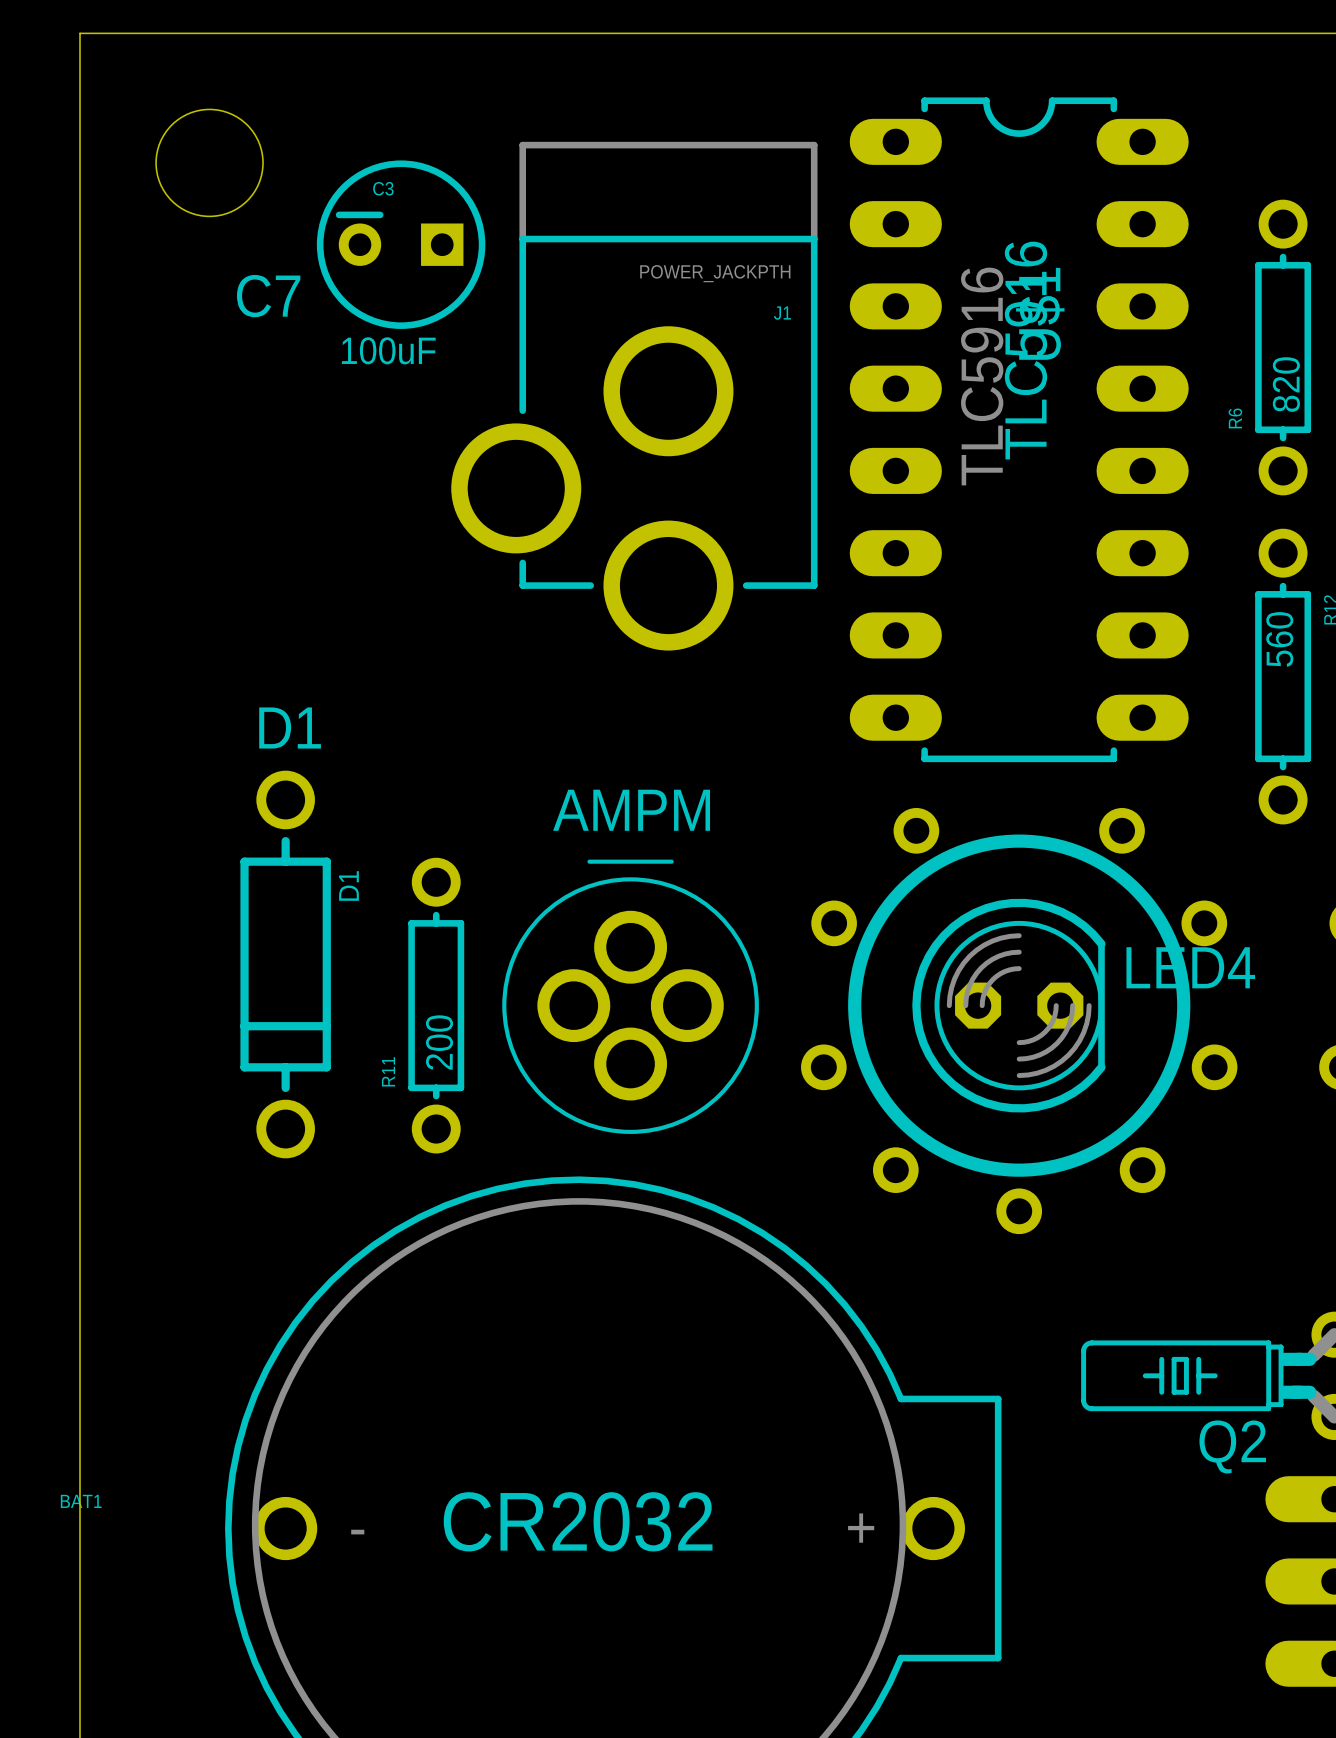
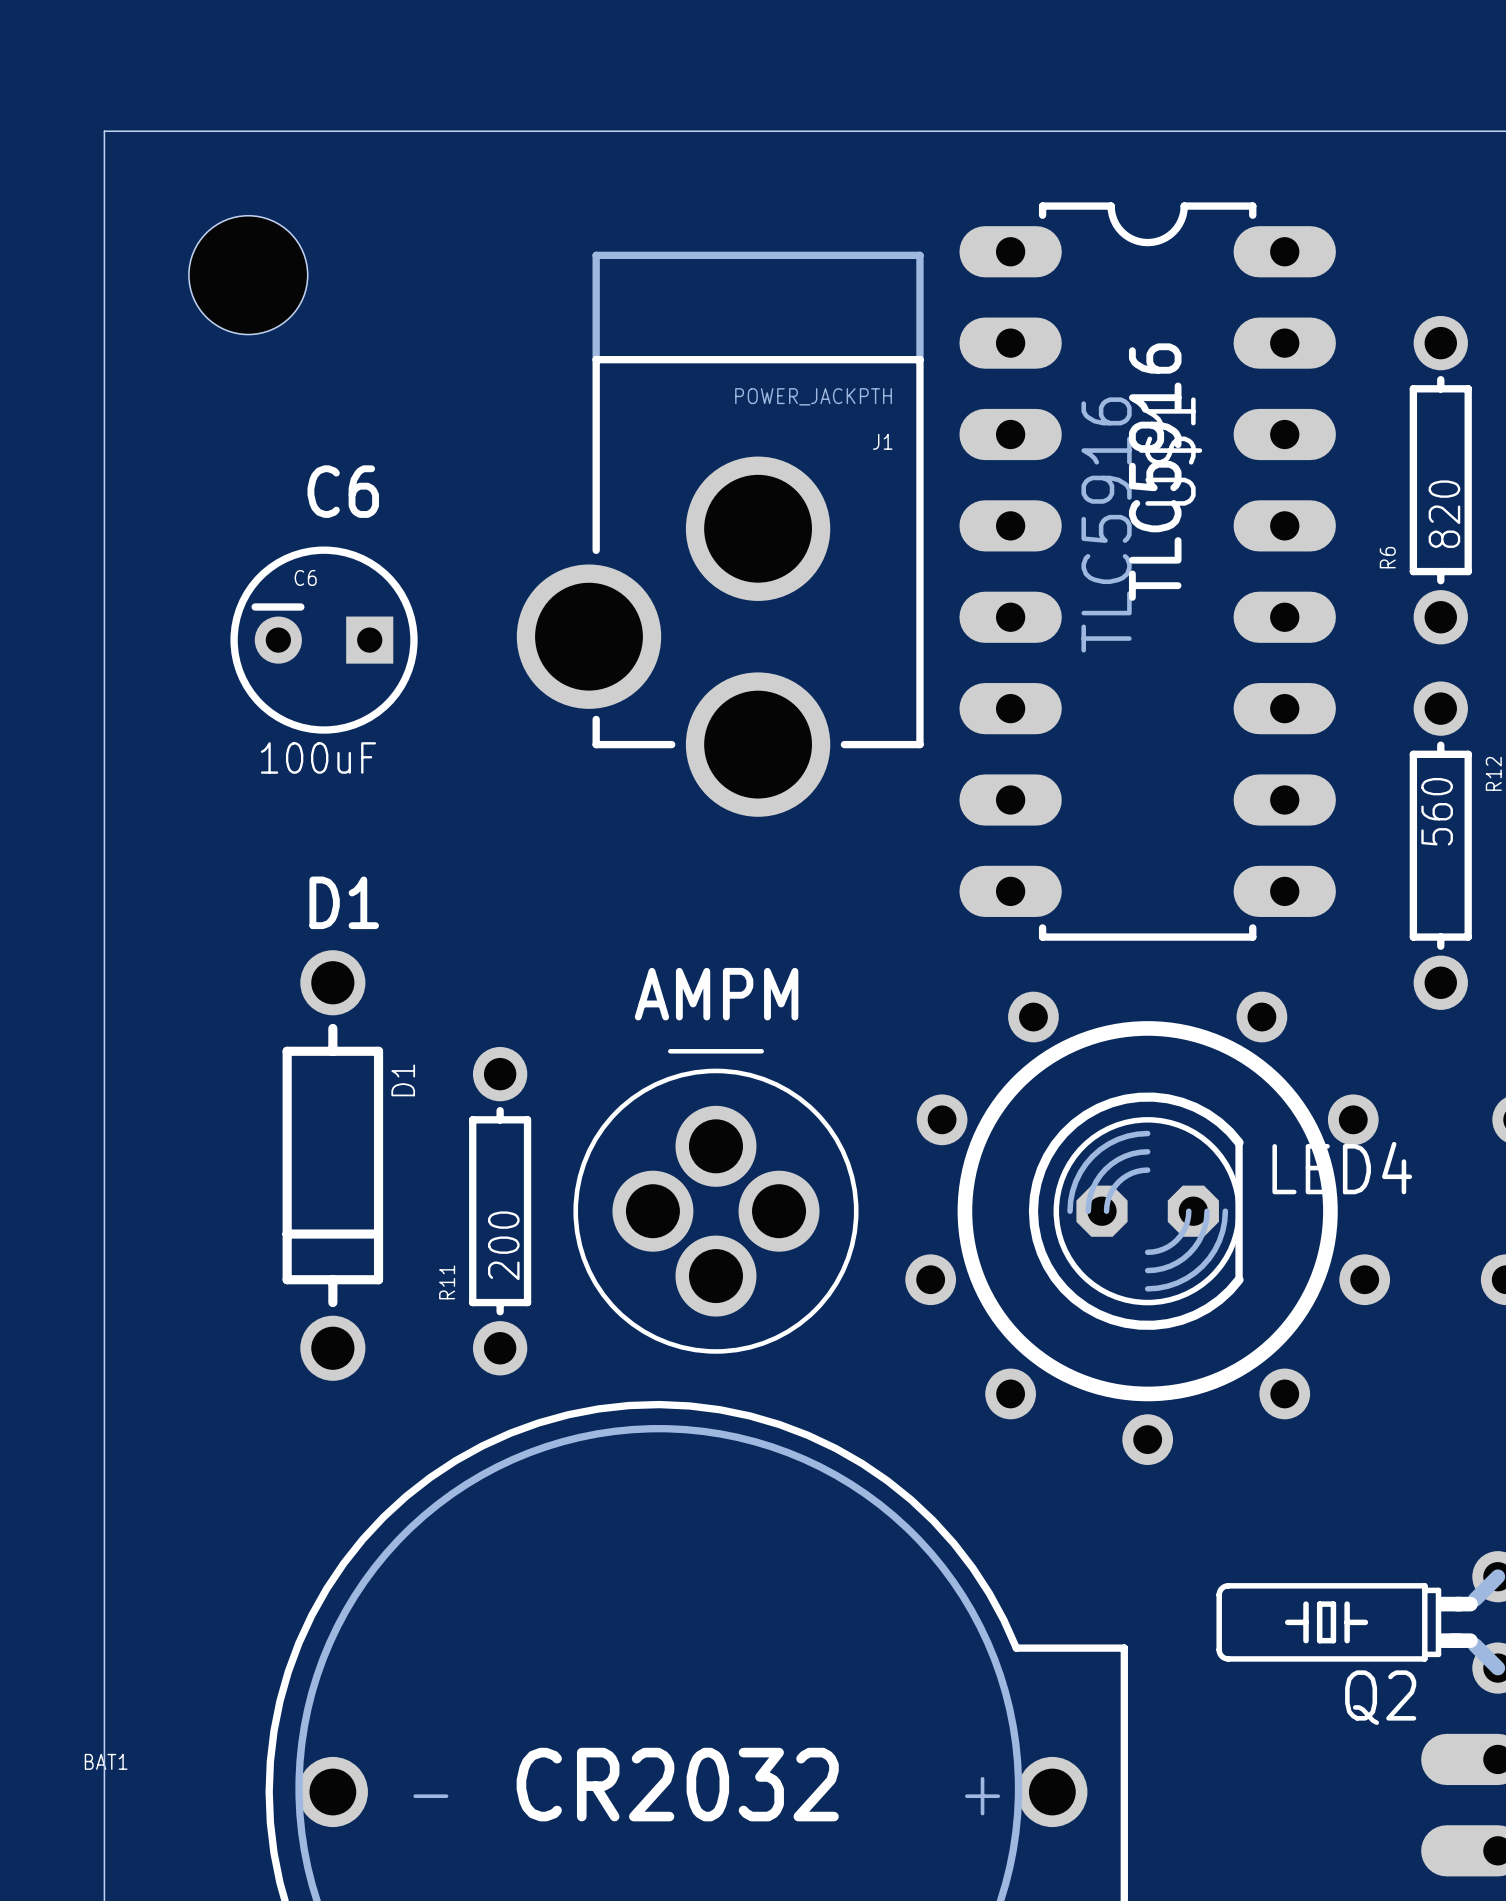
C3: 100uF (401, 244) -> none
text: C7 (268, 296) -> none
text: none -> C6 (343, 491)
C6: none -> 100uF (324, 640)

